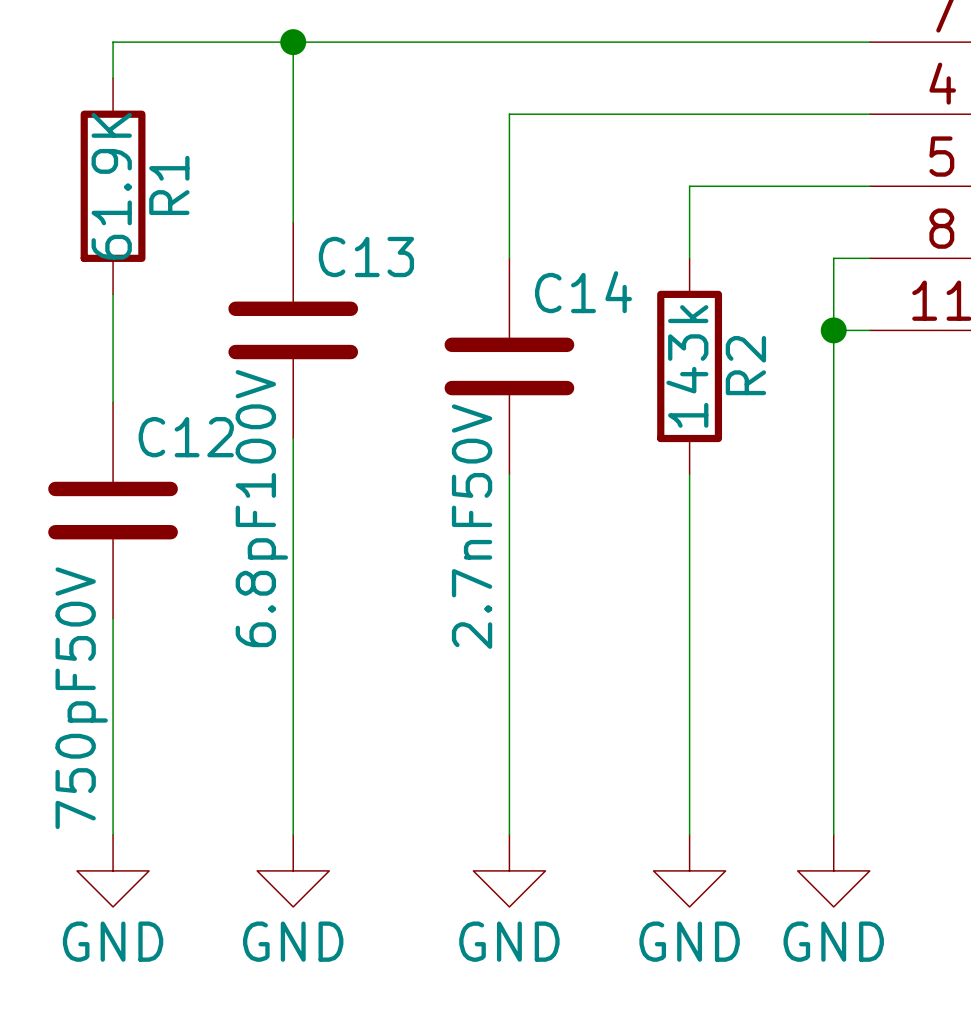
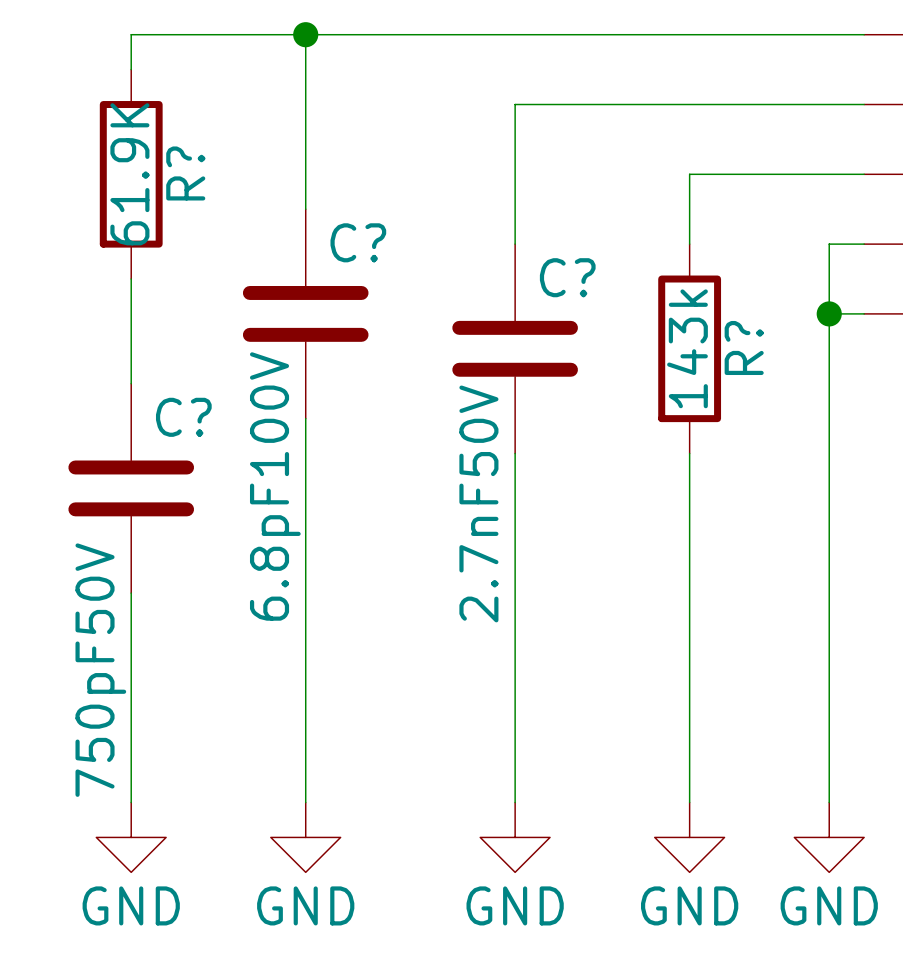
R1 name: R1 (169, 185) -> R? (185, 173)
C13 name: C13 (366, 256) -> C? (358, 242)
C14 name: C14 (583, 292) -> C? (567, 277)
R2 name: R2 (745, 365) -> R? (744, 347)
C12 name: C12 (186, 437) -> C? (183, 417)

